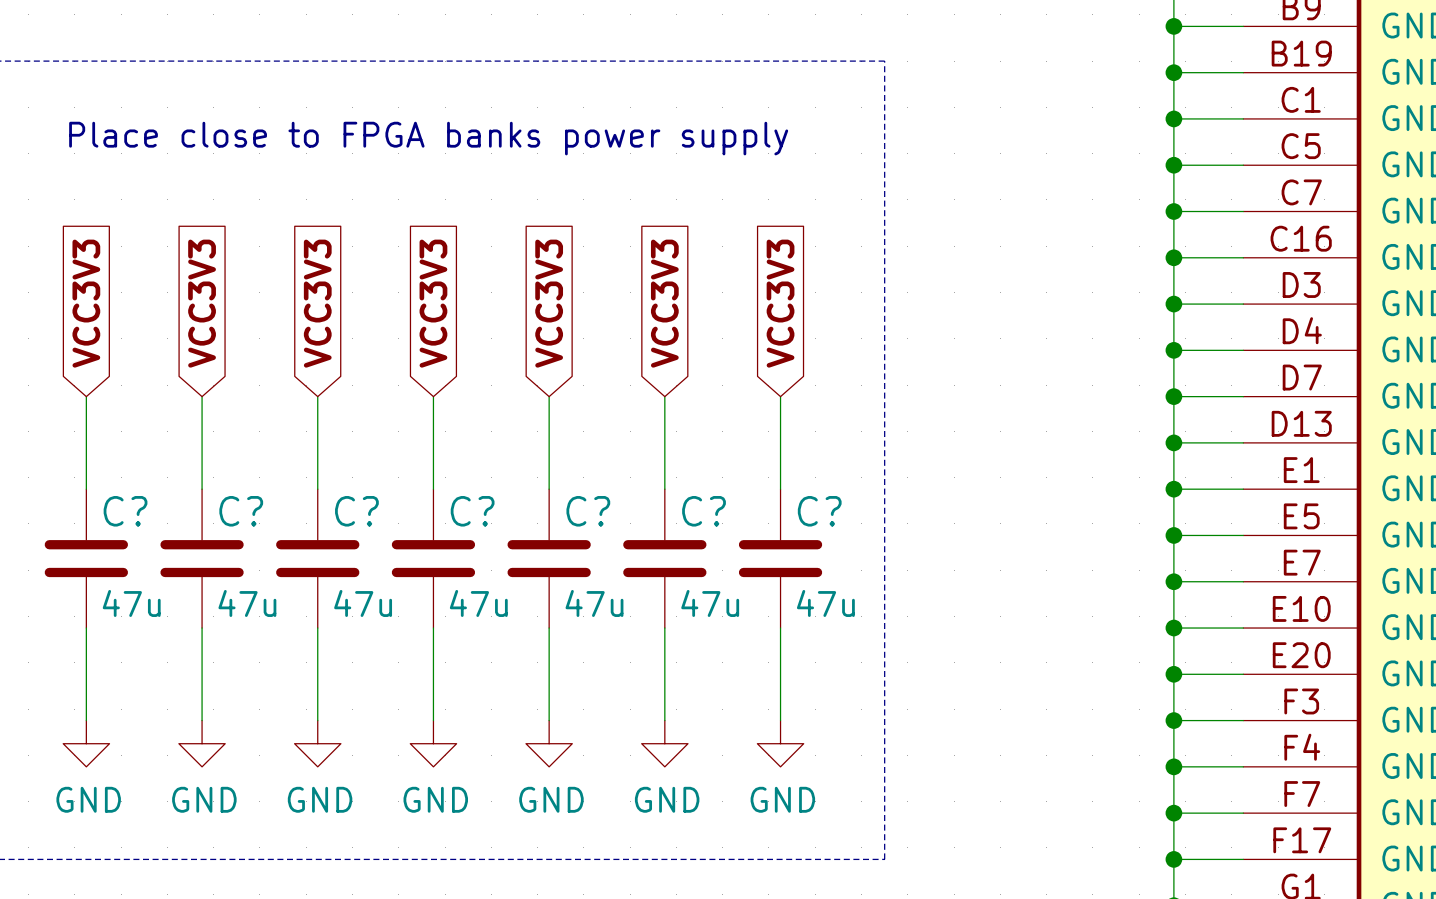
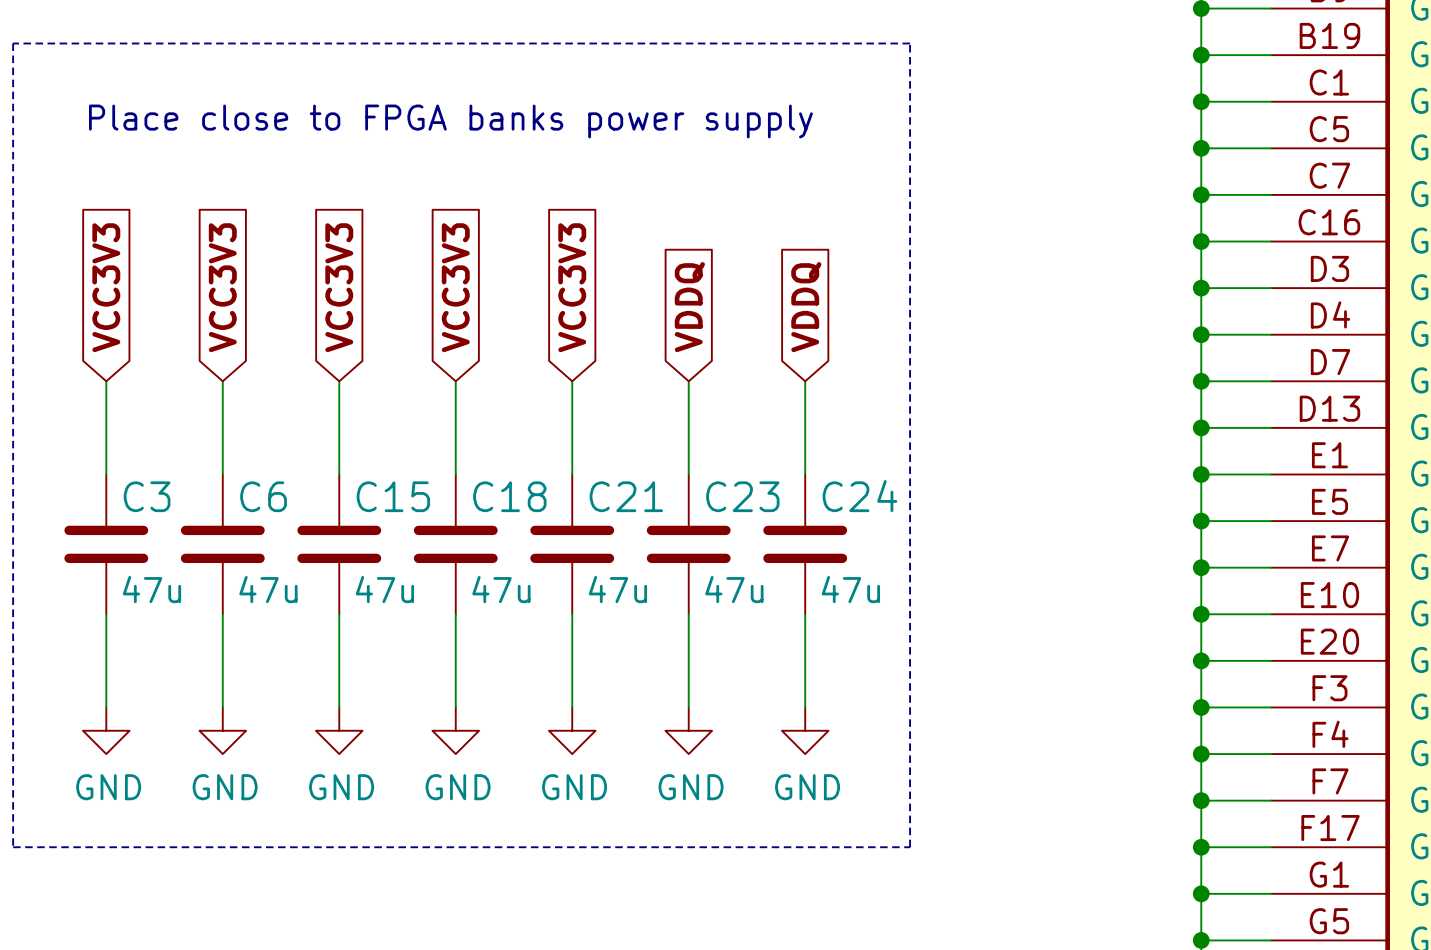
global label: VCC3V3 (664, 303) -> VDDQ (689, 307)
global label: VCC3V3 (780, 303) -> VDDQ (806, 307)
C? name: C? (125, 511) -> C3 (147, 496)
C? name: C? (241, 511) -> C6 (263, 496)
C? name: C? (356, 511) -> C15 (393, 496)
C? name: C? (472, 511) -> C18 (509, 496)
C? name: C? (588, 511) -> C21 (626, 496)
C? name: C? (704, 511) -> C23 (742, 496)
C? name: C? (819, 511) -> C24 (859, 496)

